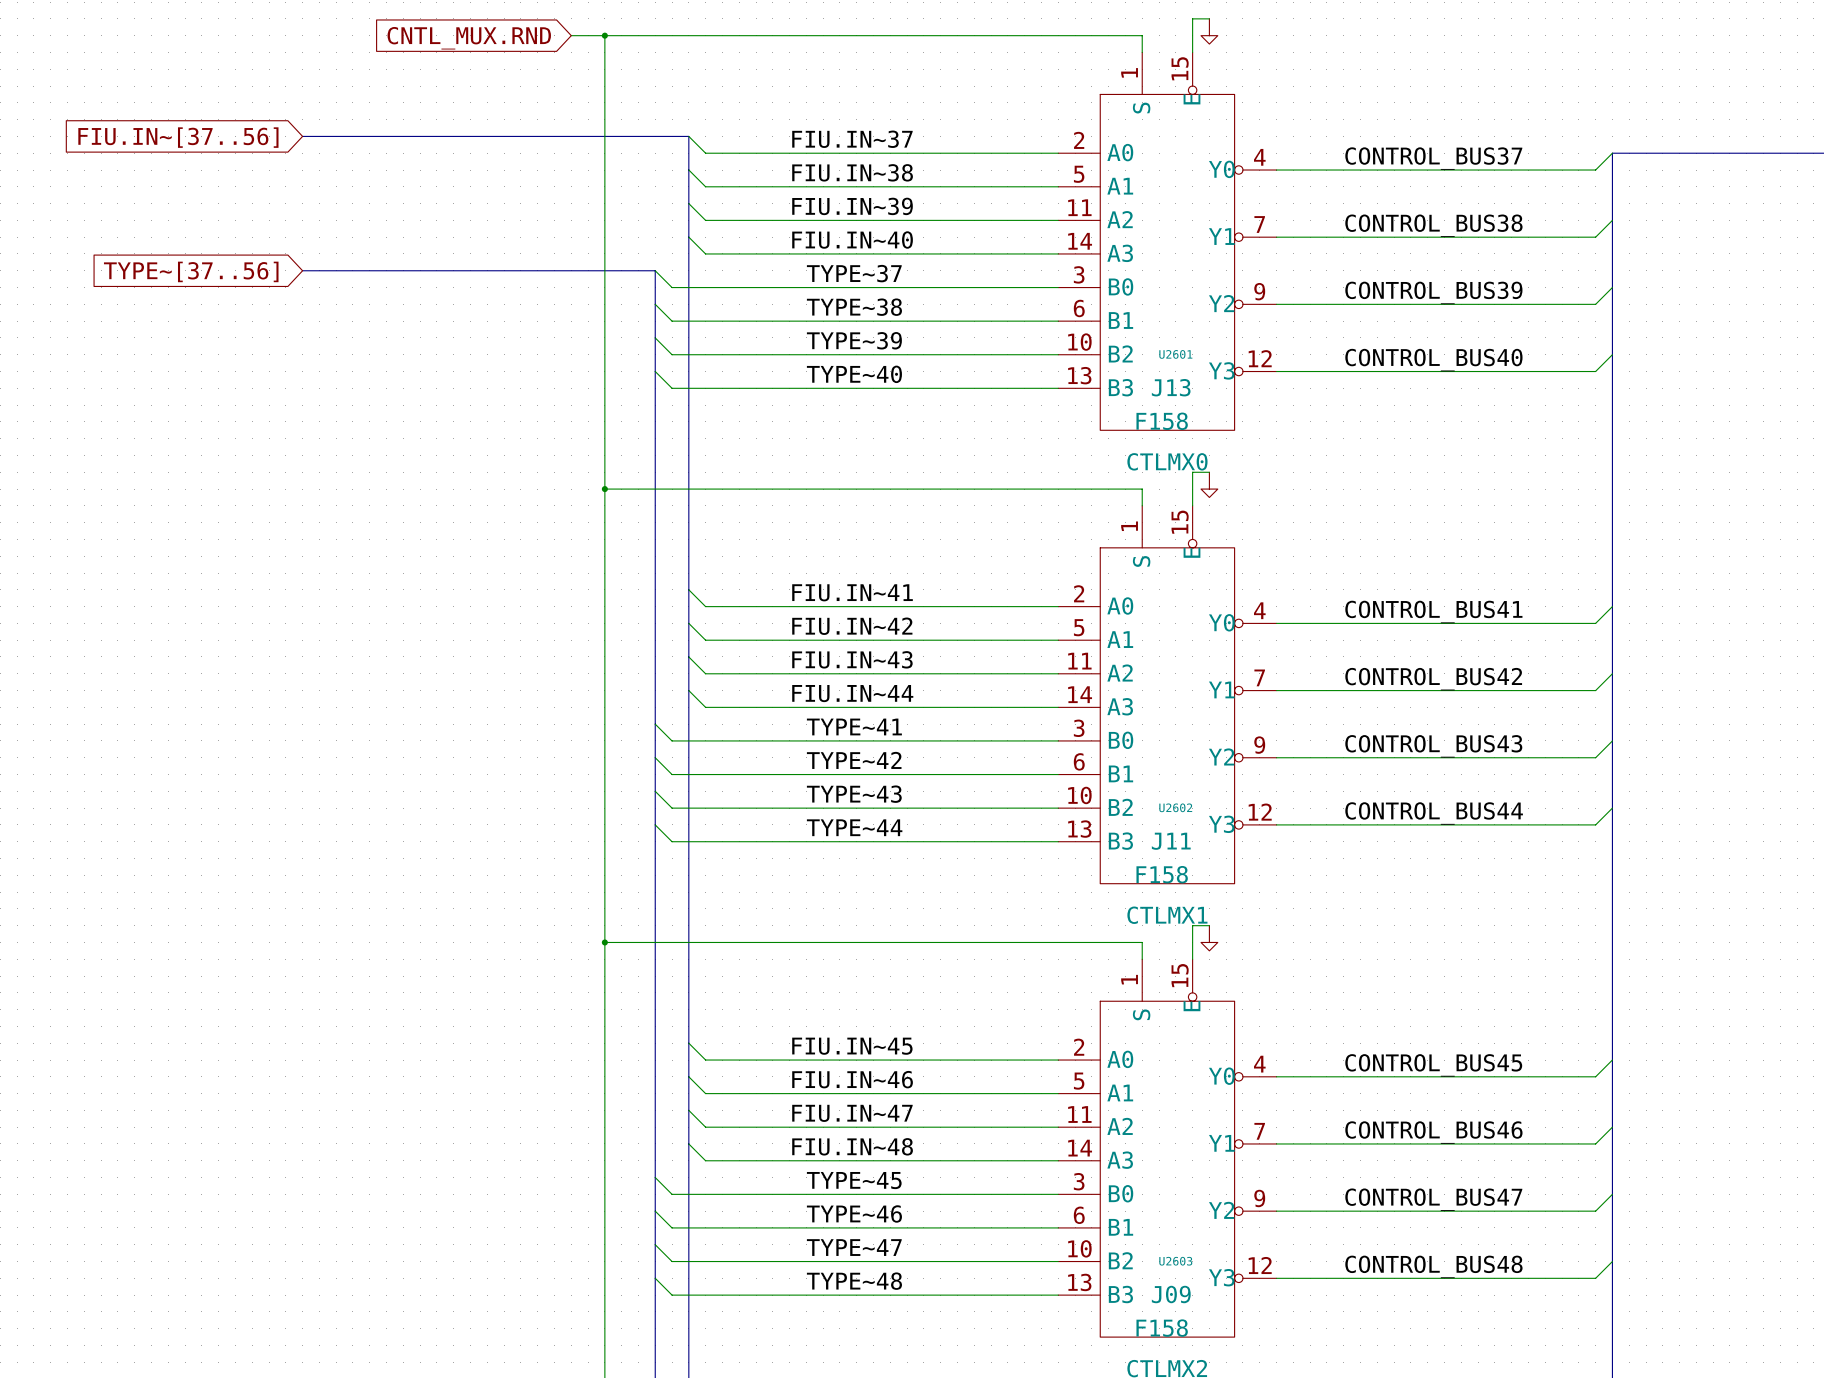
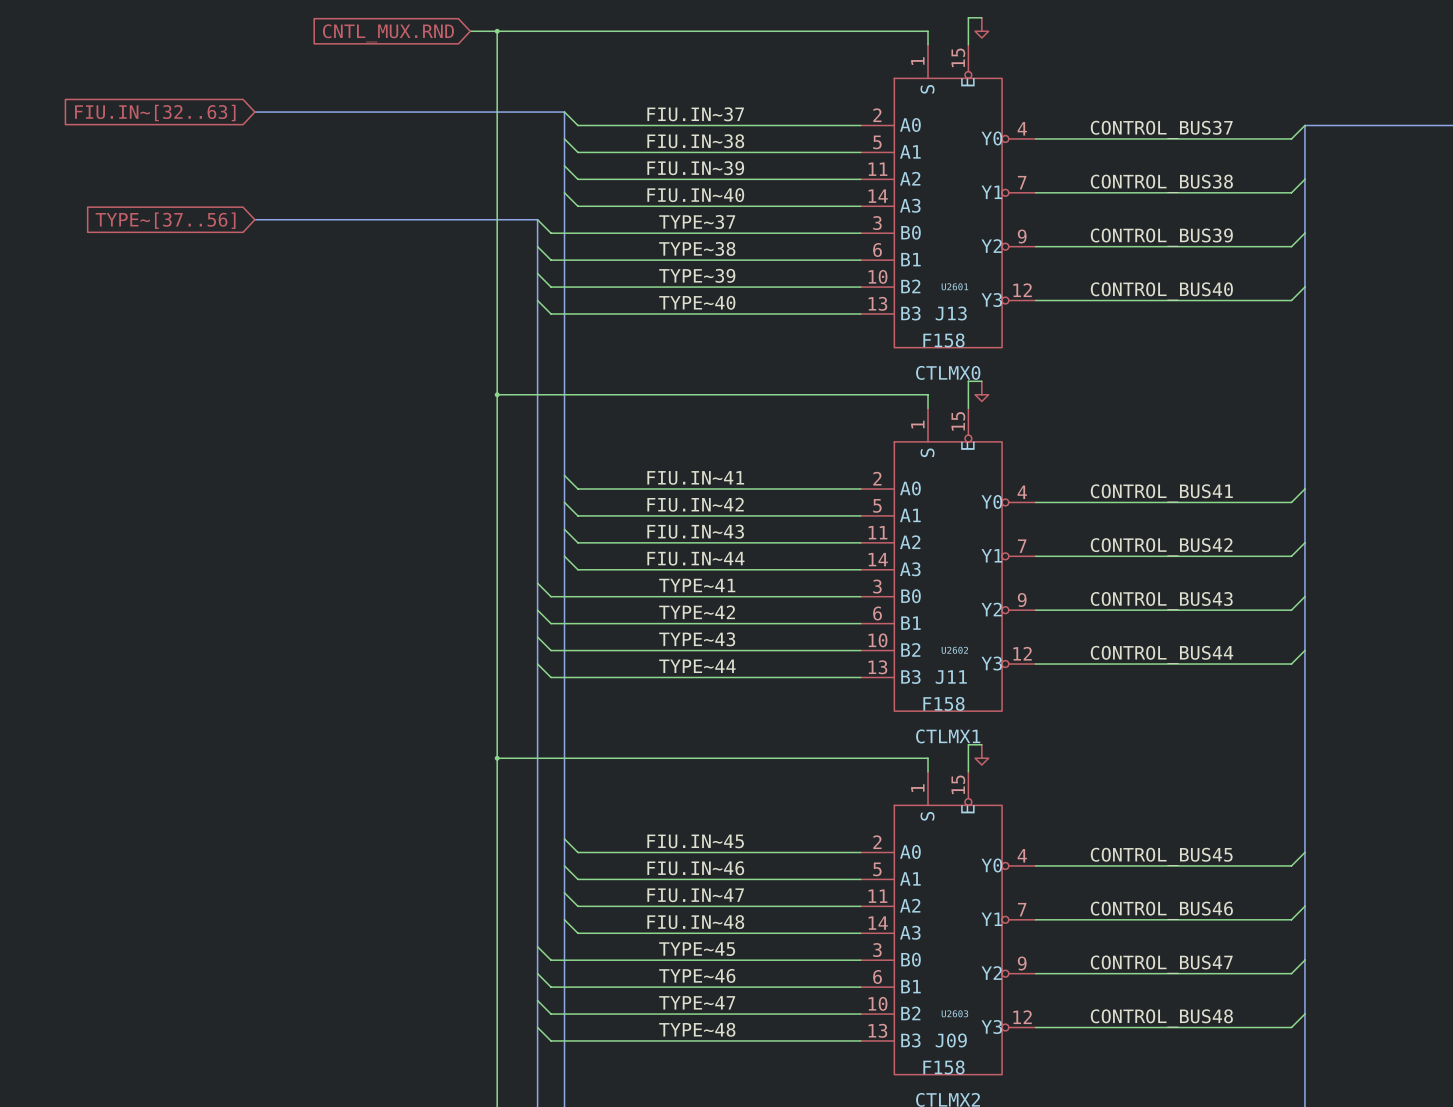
global label: FIU.IN~[37..56] (178, 137) -> FIU.IN~[32..63] (155, 112)

